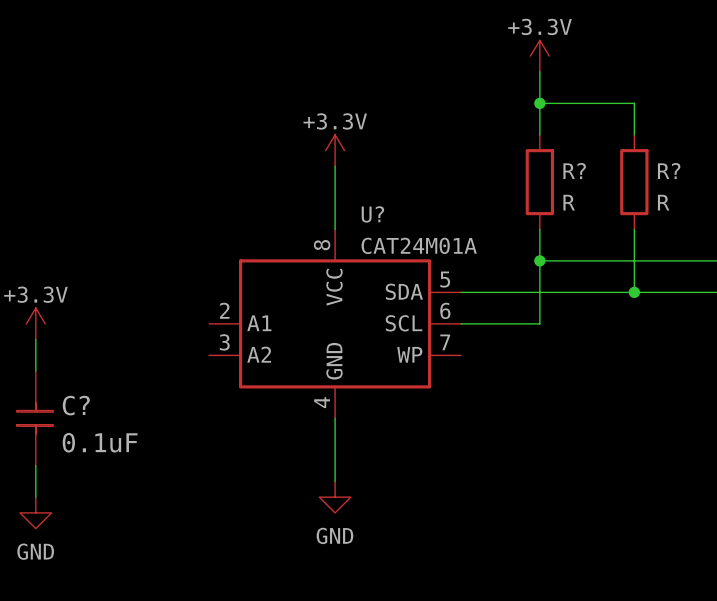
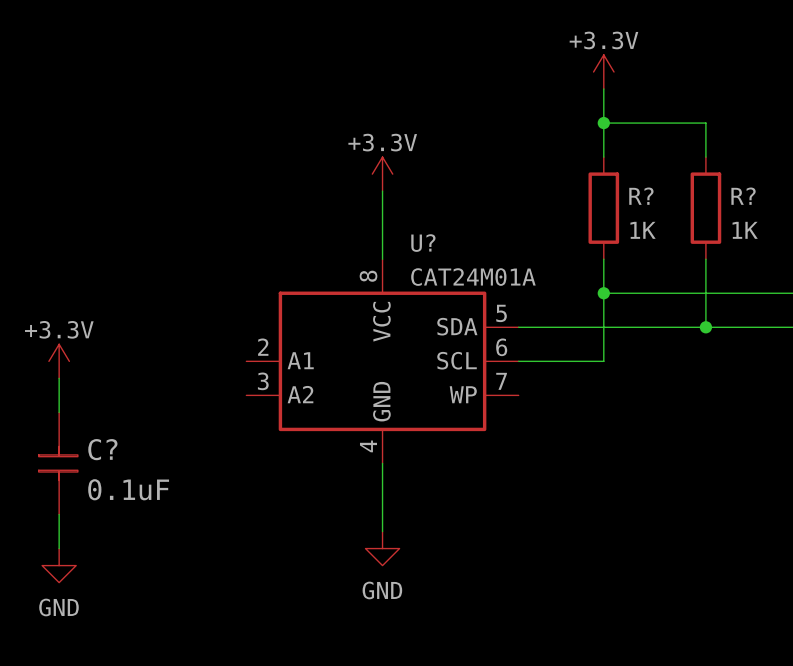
R? value: R (569, 202) -> 1K (643, 230)
R? value: R (663, 202) -> 1K (745, 230)

